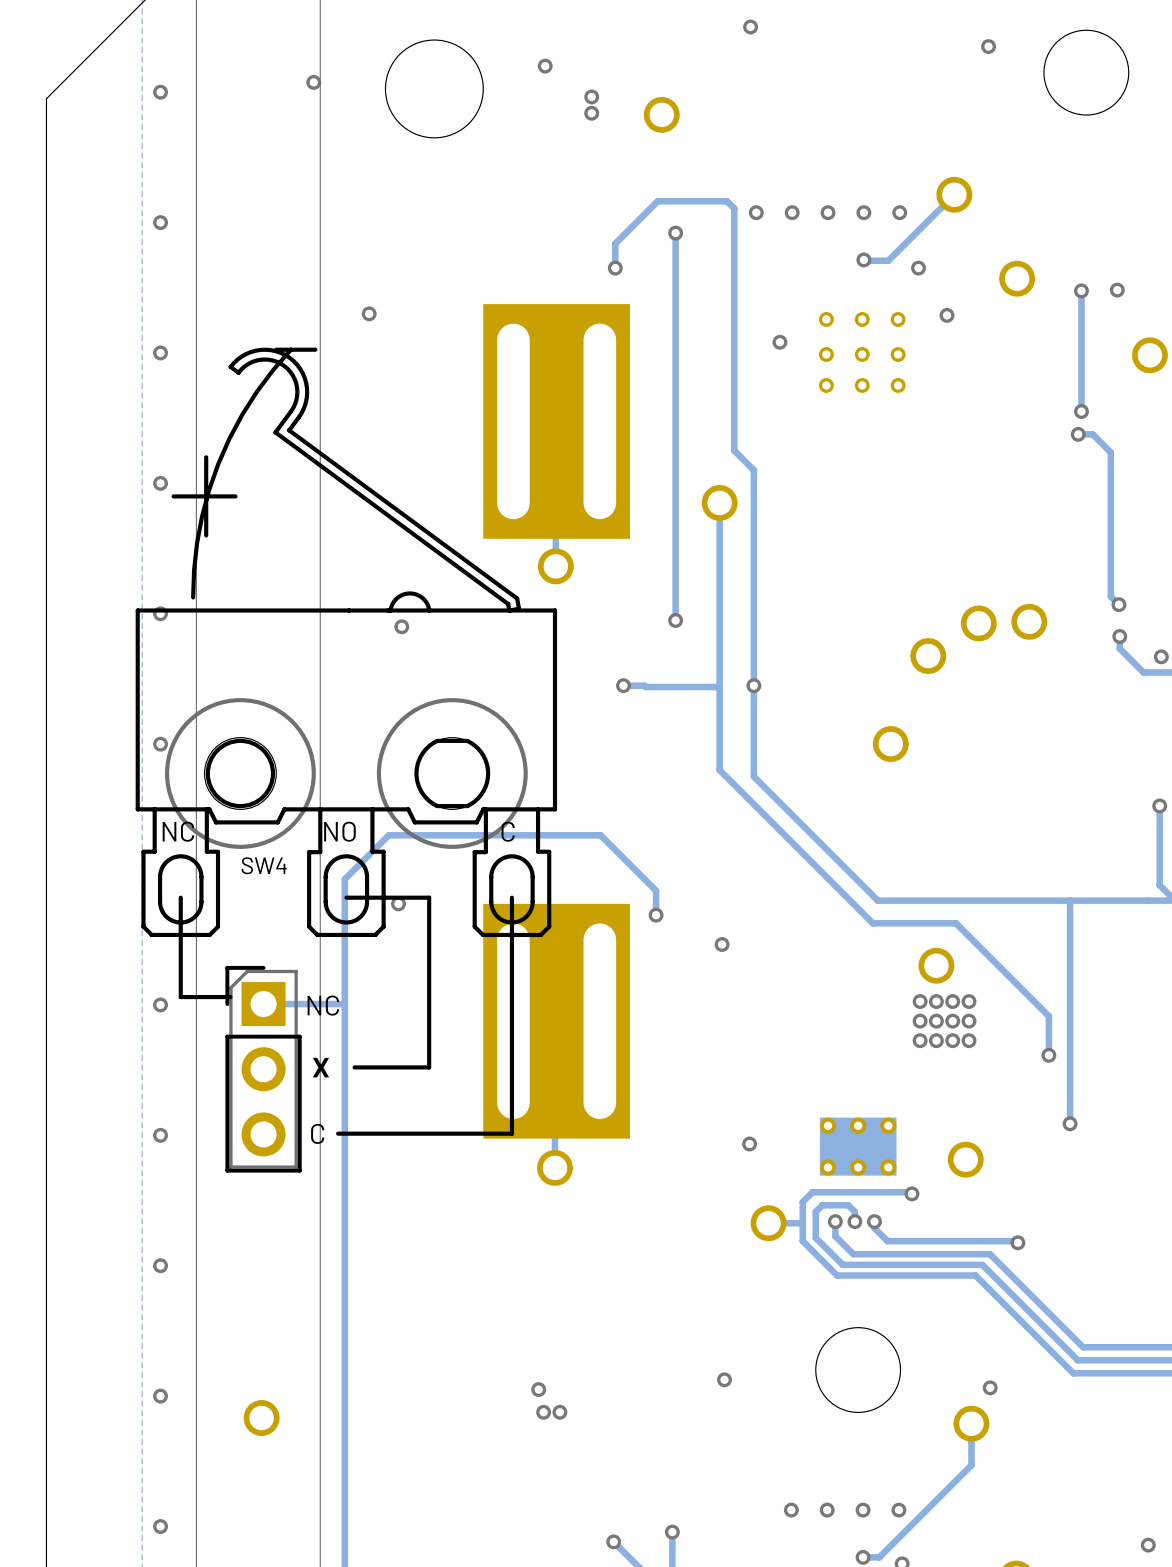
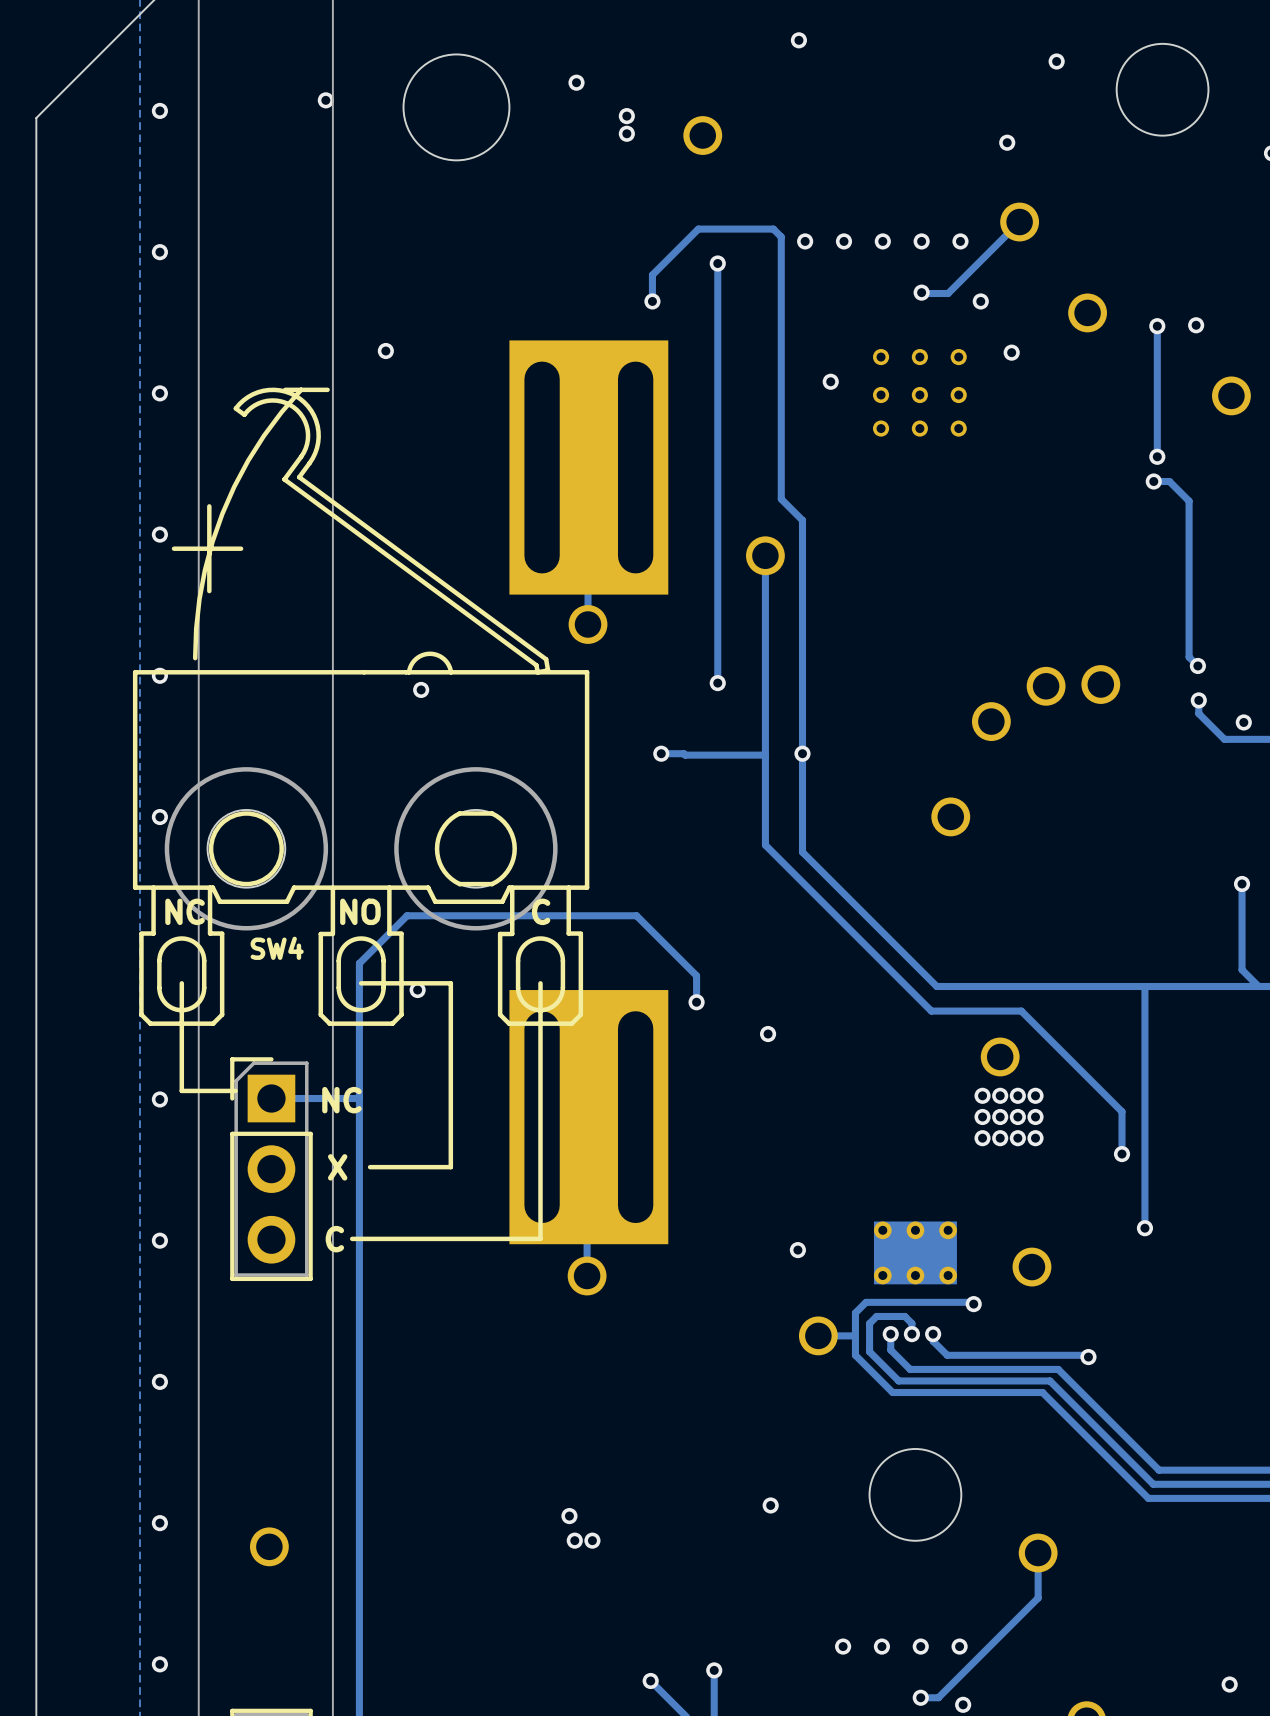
via: none -> (1007, 142)
via: (990, 1387) -> none

